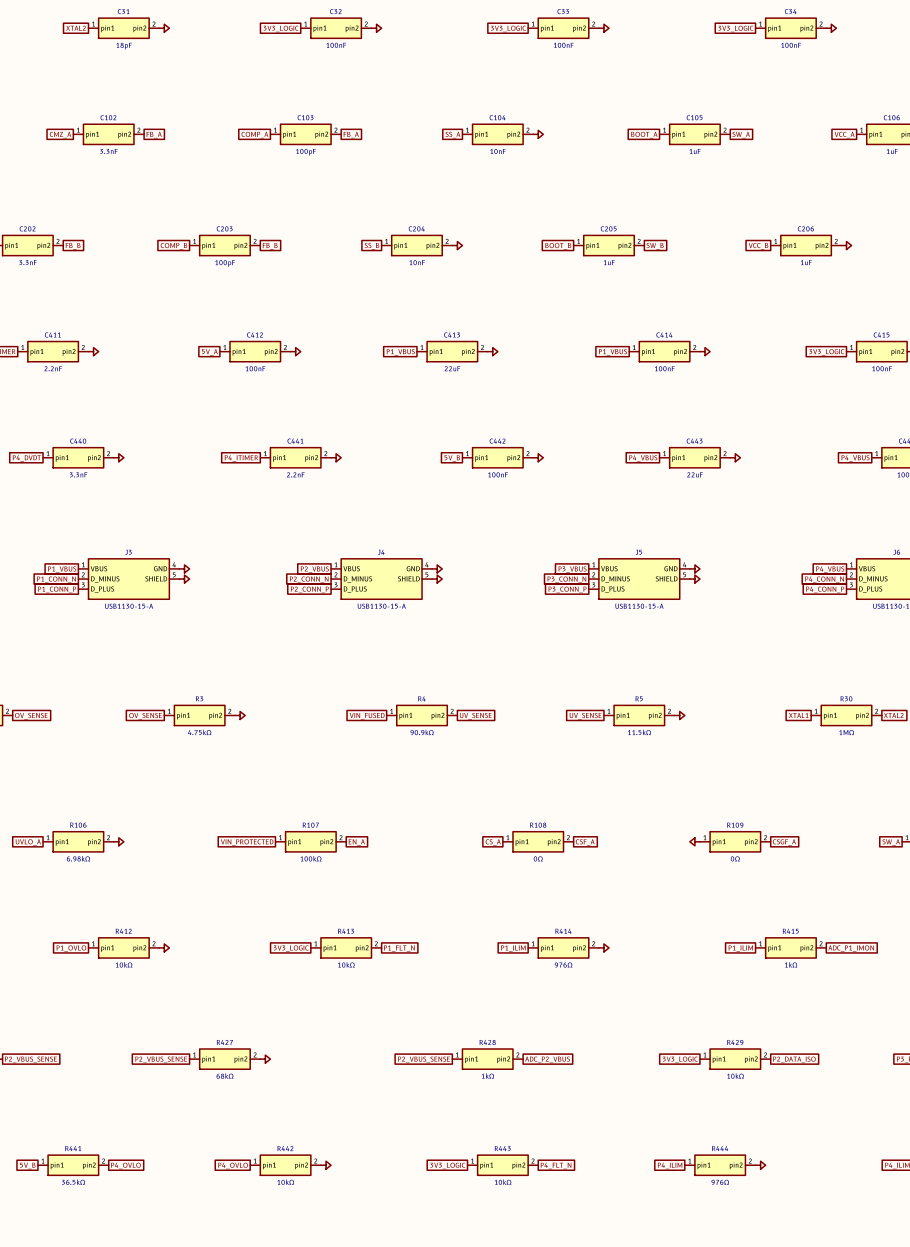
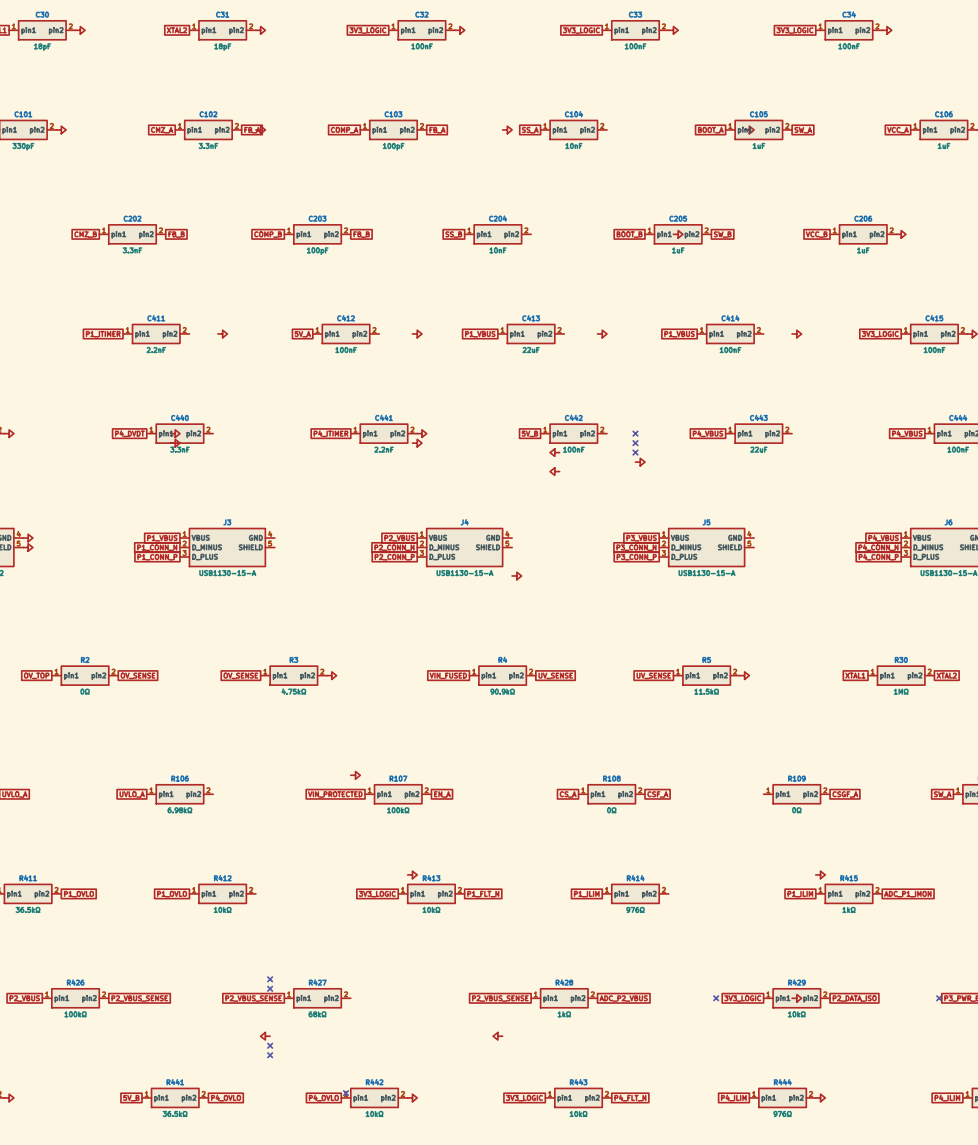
power symbol: none -> (260, 129)
power symbol: none -> (507, 129)
power symbol: (538, 134) -> none
power symbol: none -> (749, 129)
power symbol: (457, 245) -> none
power symbol: none -> (678, 234)
power symbol position: (93, 351) -> (222, 333)
power symbol position: (295, 351) -> (417, 333)
power symbol position: (492, 351) -> (602, 333)
power symbol position: (705, 351) -> (796, 333)
power symbol: none -> (175, 433)
power symbol: (118, 457) -> none
power symbol: (538, 457) -> none
no-connect mark: none -> (635, 433)
power symbol: (735, 457) -> none
power symbol: none -> (175, 443)
power symbol: none -> (417, 443)
no-connect mark: none -> (635, 443)
power symbol: none -> (554, 452)
no-connect mark: none -> (635, 452)
power symbol: none -> (640, 462)
power symbol: none -> (554, 471)
power symbol: (184, 568) -> none
power symbol: (437, 568) -> none
power symbol: (694, 568) -> none
power symbol: (184, 579) -> none
power symbol: (437, 579) -> none
power symbol: (694, 579) -> none
power symbol: none -> (516, 575)
power symbol: none -> (355, 775)
power symbol: (118, 841) -> none
power symbol: (694, 841) -> none
power symbol: none -> (412, 874)
power symbol: none -> (820, 874)
power symbol: (164, 947) -> none
power symbol: (603, 947) -> none
no-connect mark: none -> (270, 979)
no-connect mark: none -> (270, 988)
power symbol: (265, 1059) -> none
no-connect mark: none -> (716, 998)
power symbol: none -> (796, 998)
no-connect mark: none -> (939, 998)
power symbol: none -> (265, 1036)
power symbol: none -> (497, 1036)
no-connect mark: none -> (270, 1045)
no-connect mark: none -> (270, 1055)
no-connect mark: none -> (346, 1093)

